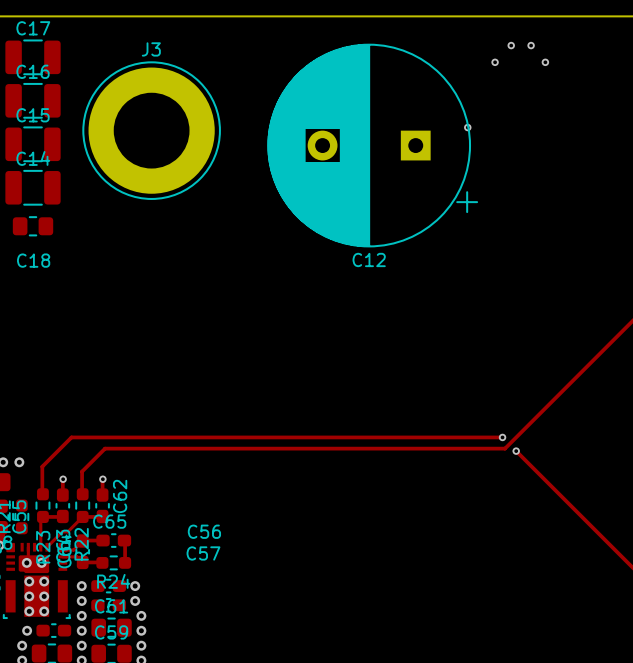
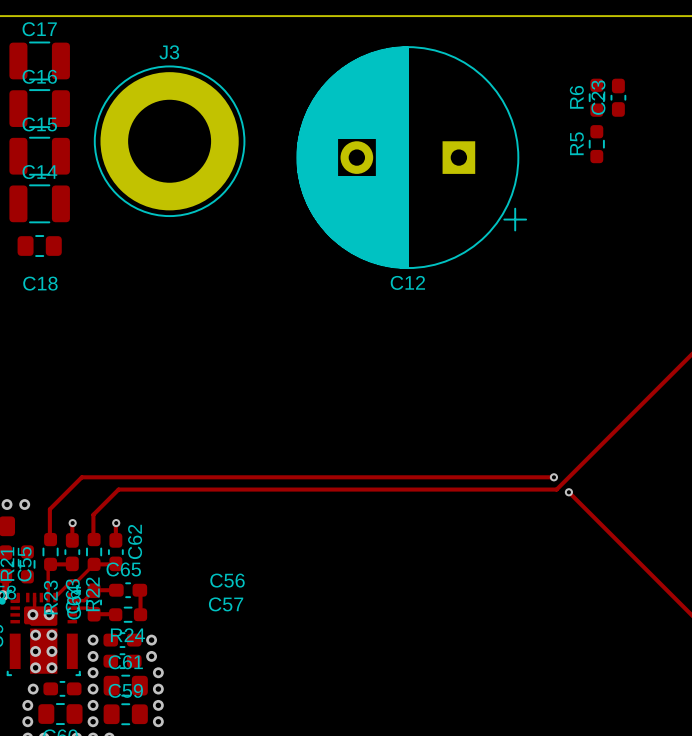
via: (511, 45) -> none
via: (531, 45) -> none
via: (495, 62) -> none
via: (545, 62) -> none
R6: none -> (596, 97)
C23: none -> (618, 97)
via: (467, 127) -> none
R5: none -> (596, 144)

